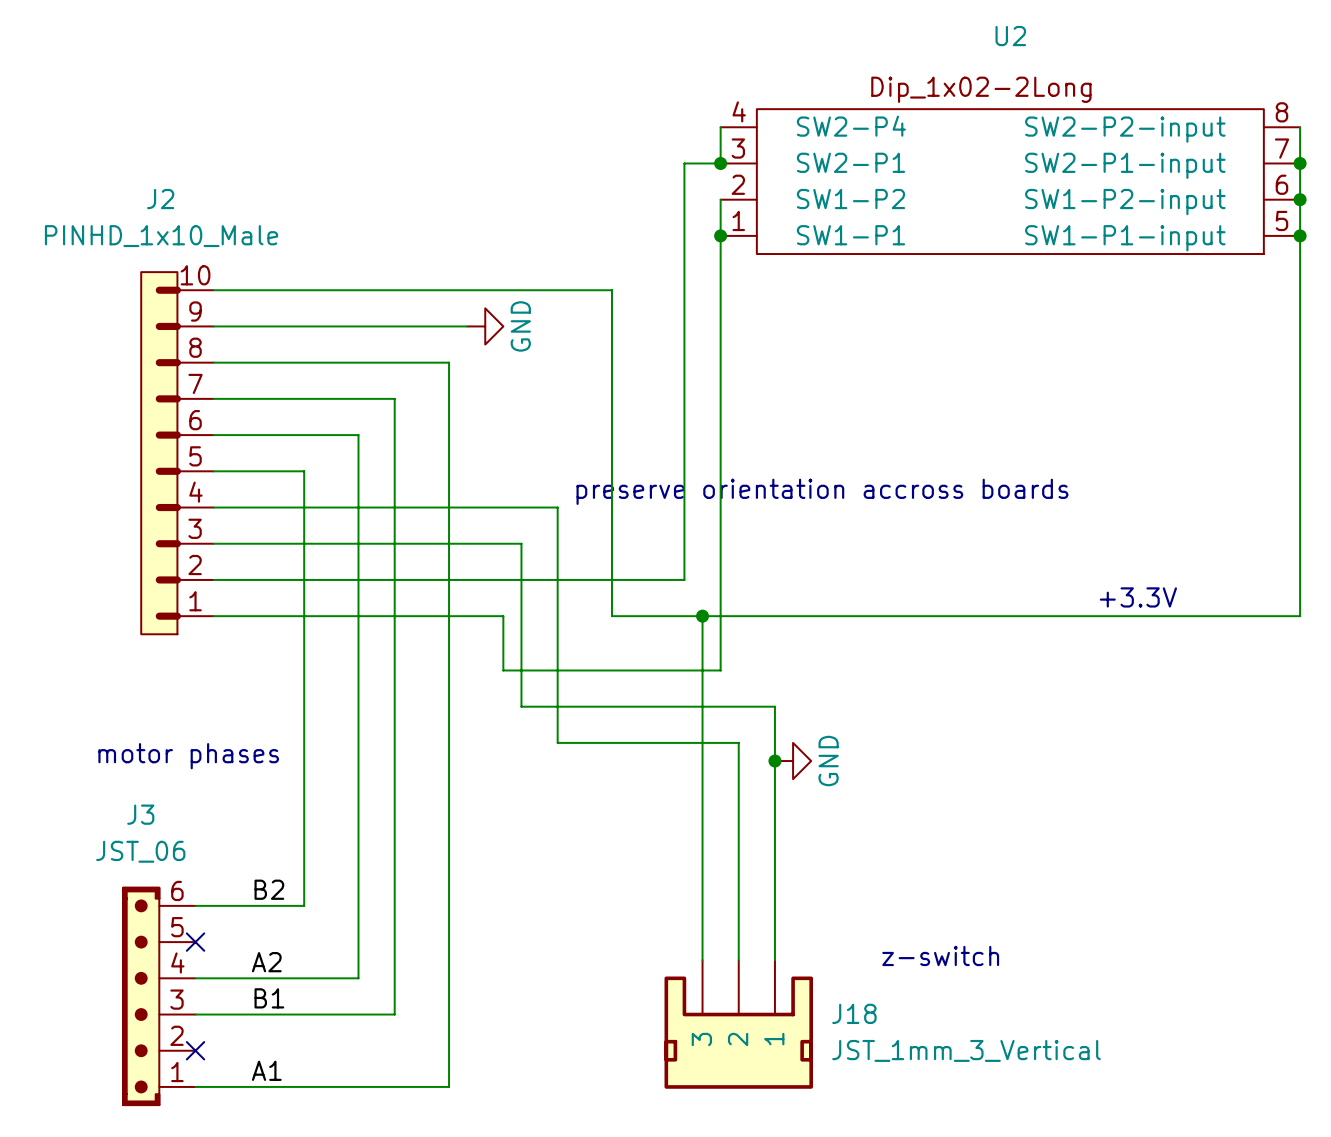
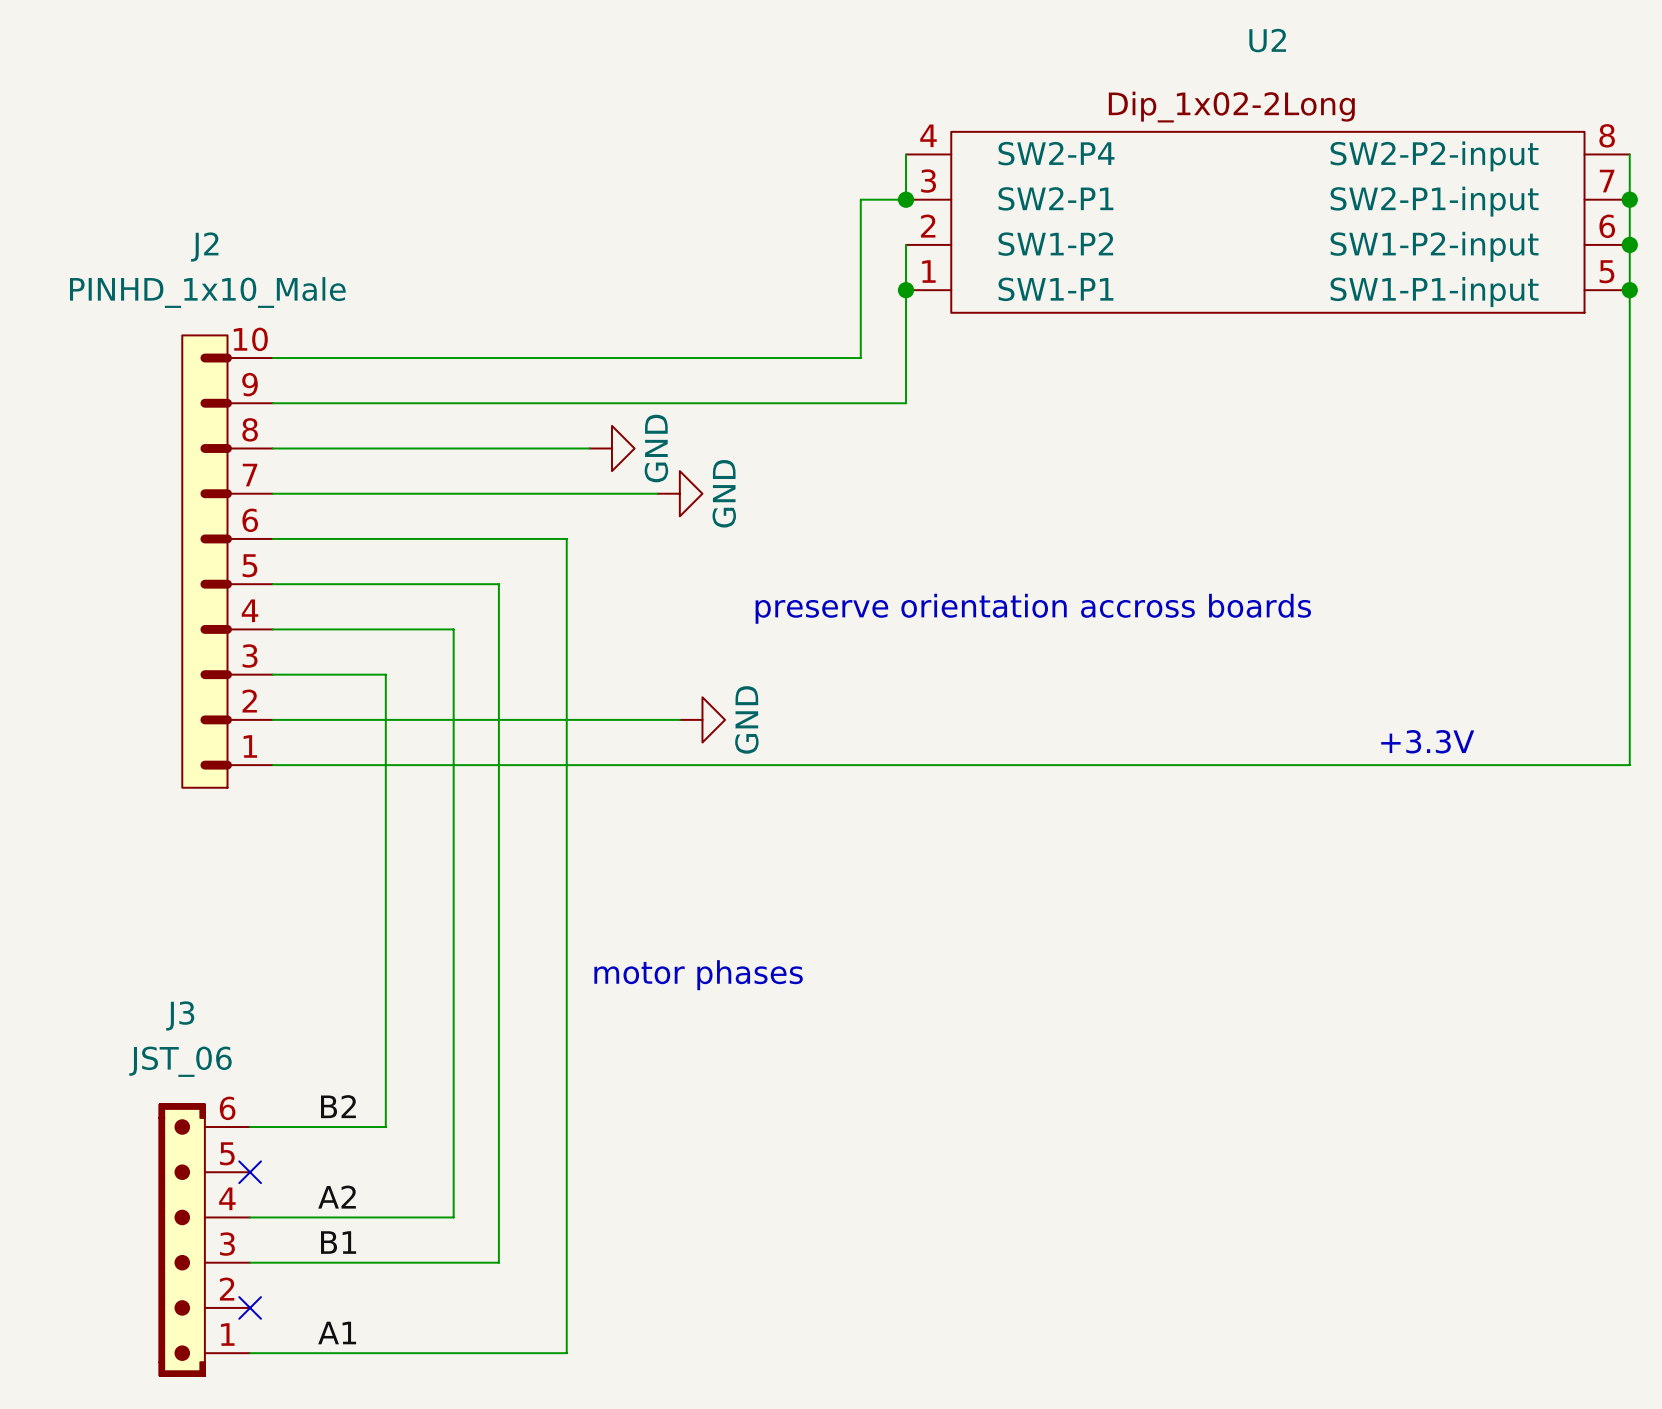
wire: (611, 290) (611, 616) -> (634, 765) (770, 765)
wire: (684, 290) (684, 579) (539, 579) -> (860, 358) (770, 358)
power symbol position: GND (485, 326) -> GND (611, 448)
wire: (720, 326) (720, 670) (503, 670) (503, 616) -> (906, 403) (589, 403)
wire: (449, 362) (449, 435) -> (566, 448) (589, 448)
wire: (394, 398) (394, 471) -> (385, 584) (498, 584)
wire: none -> (498, 493) (657, 493)
power symbol: none -> GND (679, 493)
wire: (358, 435) (358, 507) (557, 507) (557, 742) (738, 742) (738, 960) -> (453, 538) (566, 538)
wire: (304, 471) (304, 543) (521, 543) (521, 706) (774, 706) (774, 960) -> none
power symbol: none -> GND (702, 719)
wire: (702, 616) (702, 960) -> none
junction: (702, 616) -> none
text: motor phases (188, 756) -> none
junction: (774, 761) -> none
power symbol: GND (793, 761) -> none
text: none -> motor phases (698, 975)
text: z-switch (940, 955) -> none
J18: JST_1mm_3_Vertical (738, 1024) -> none

